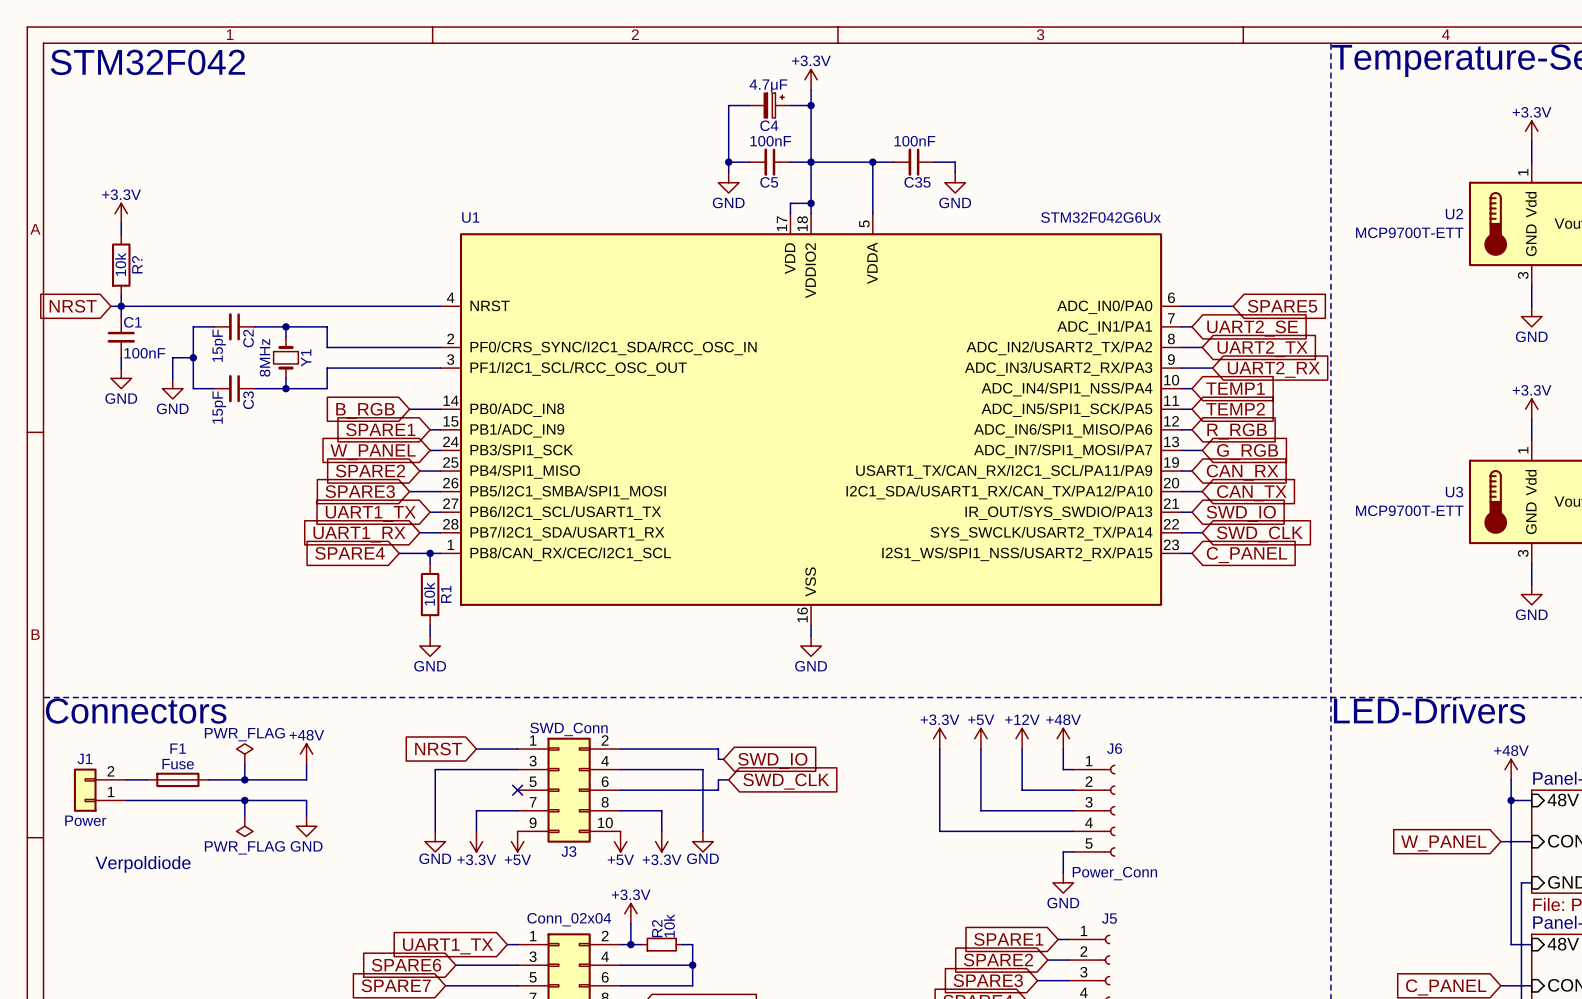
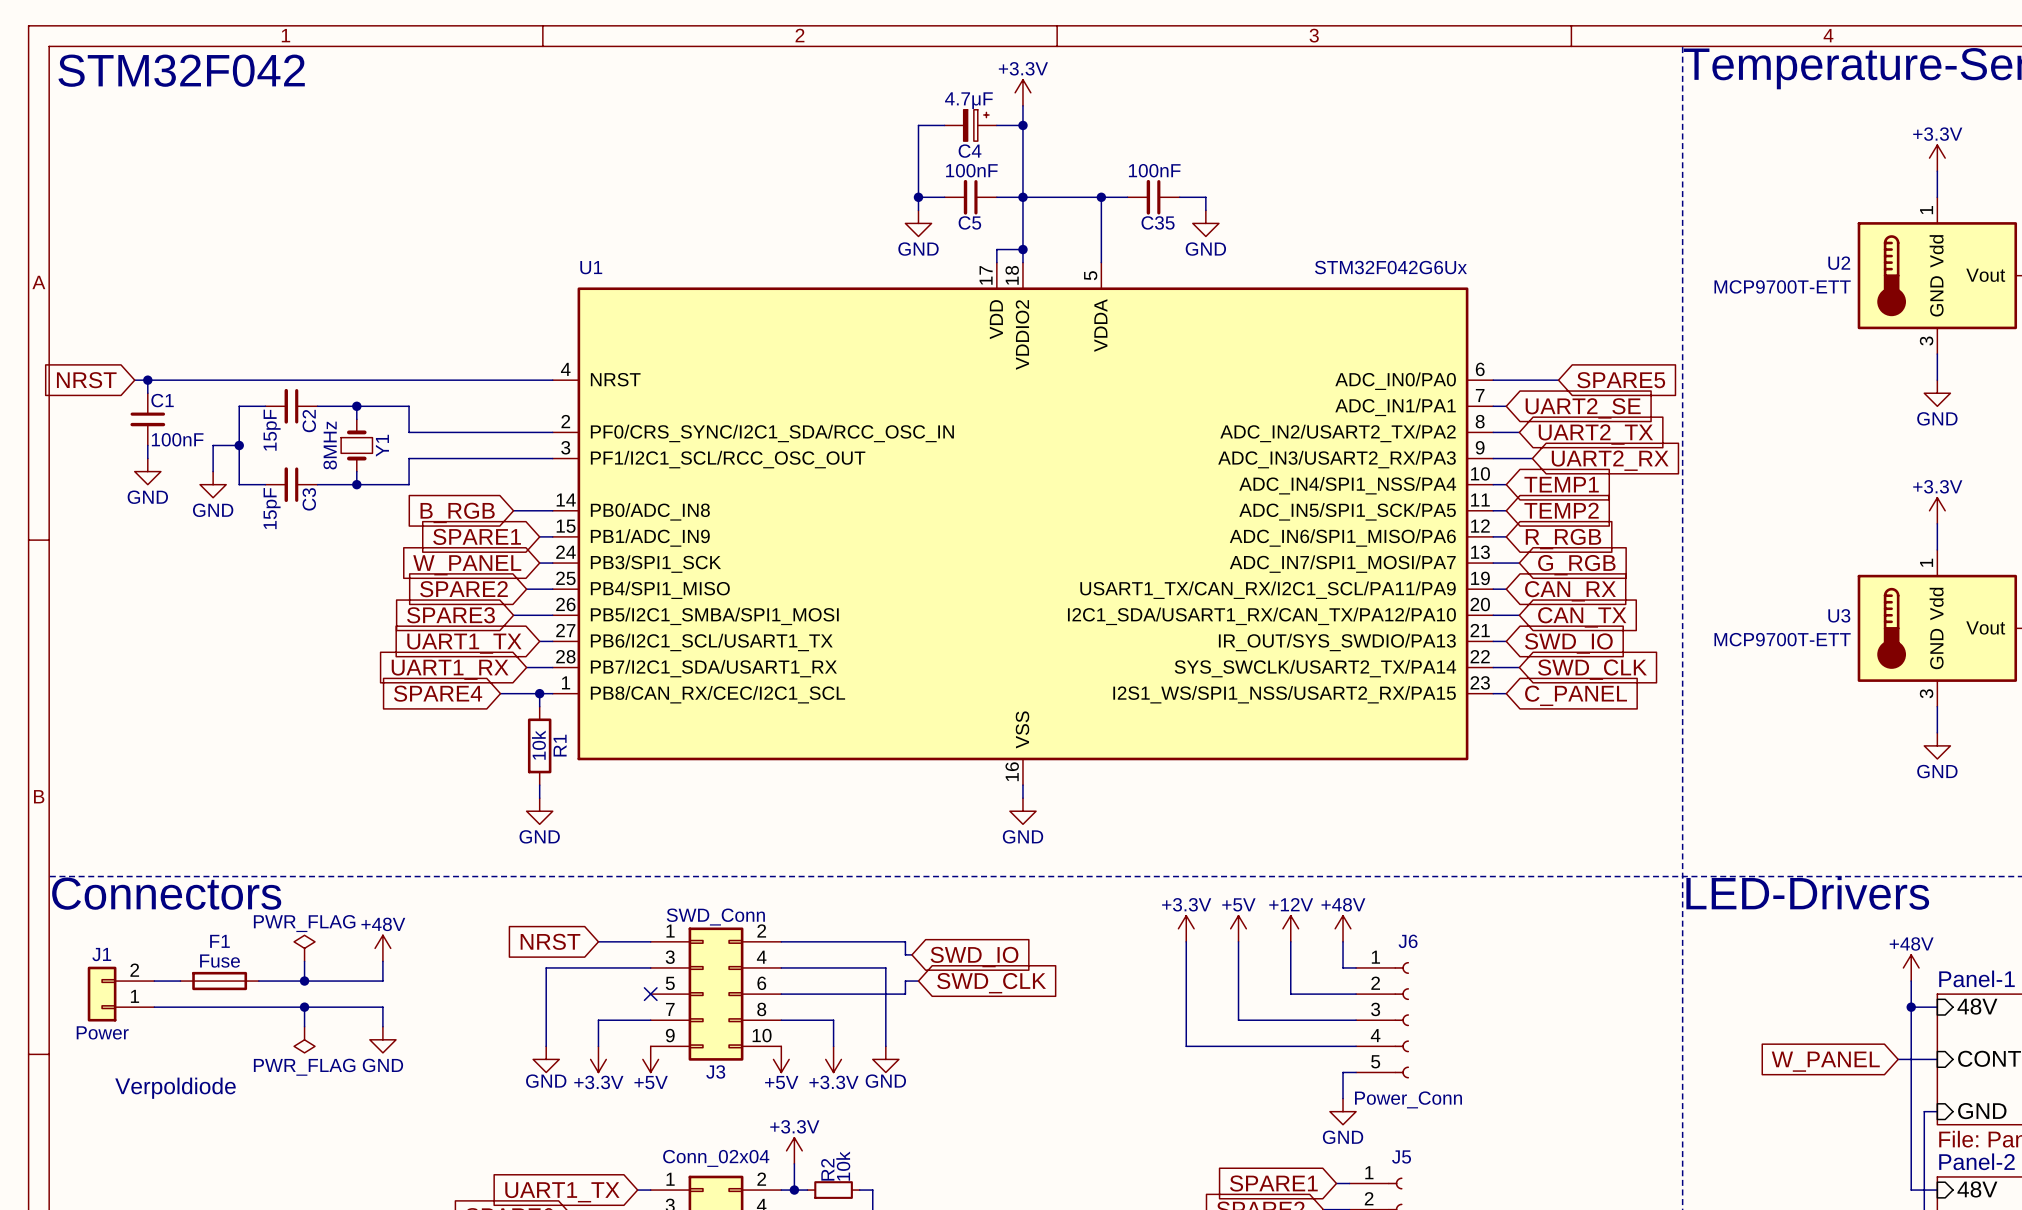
power symbol: +3.3V (121, 213) -> none
wire: (121, 223) (121, 234) -> none
R?: 10k (121, 265) -> none
wire: (121, 296) (121, 306) -> none

